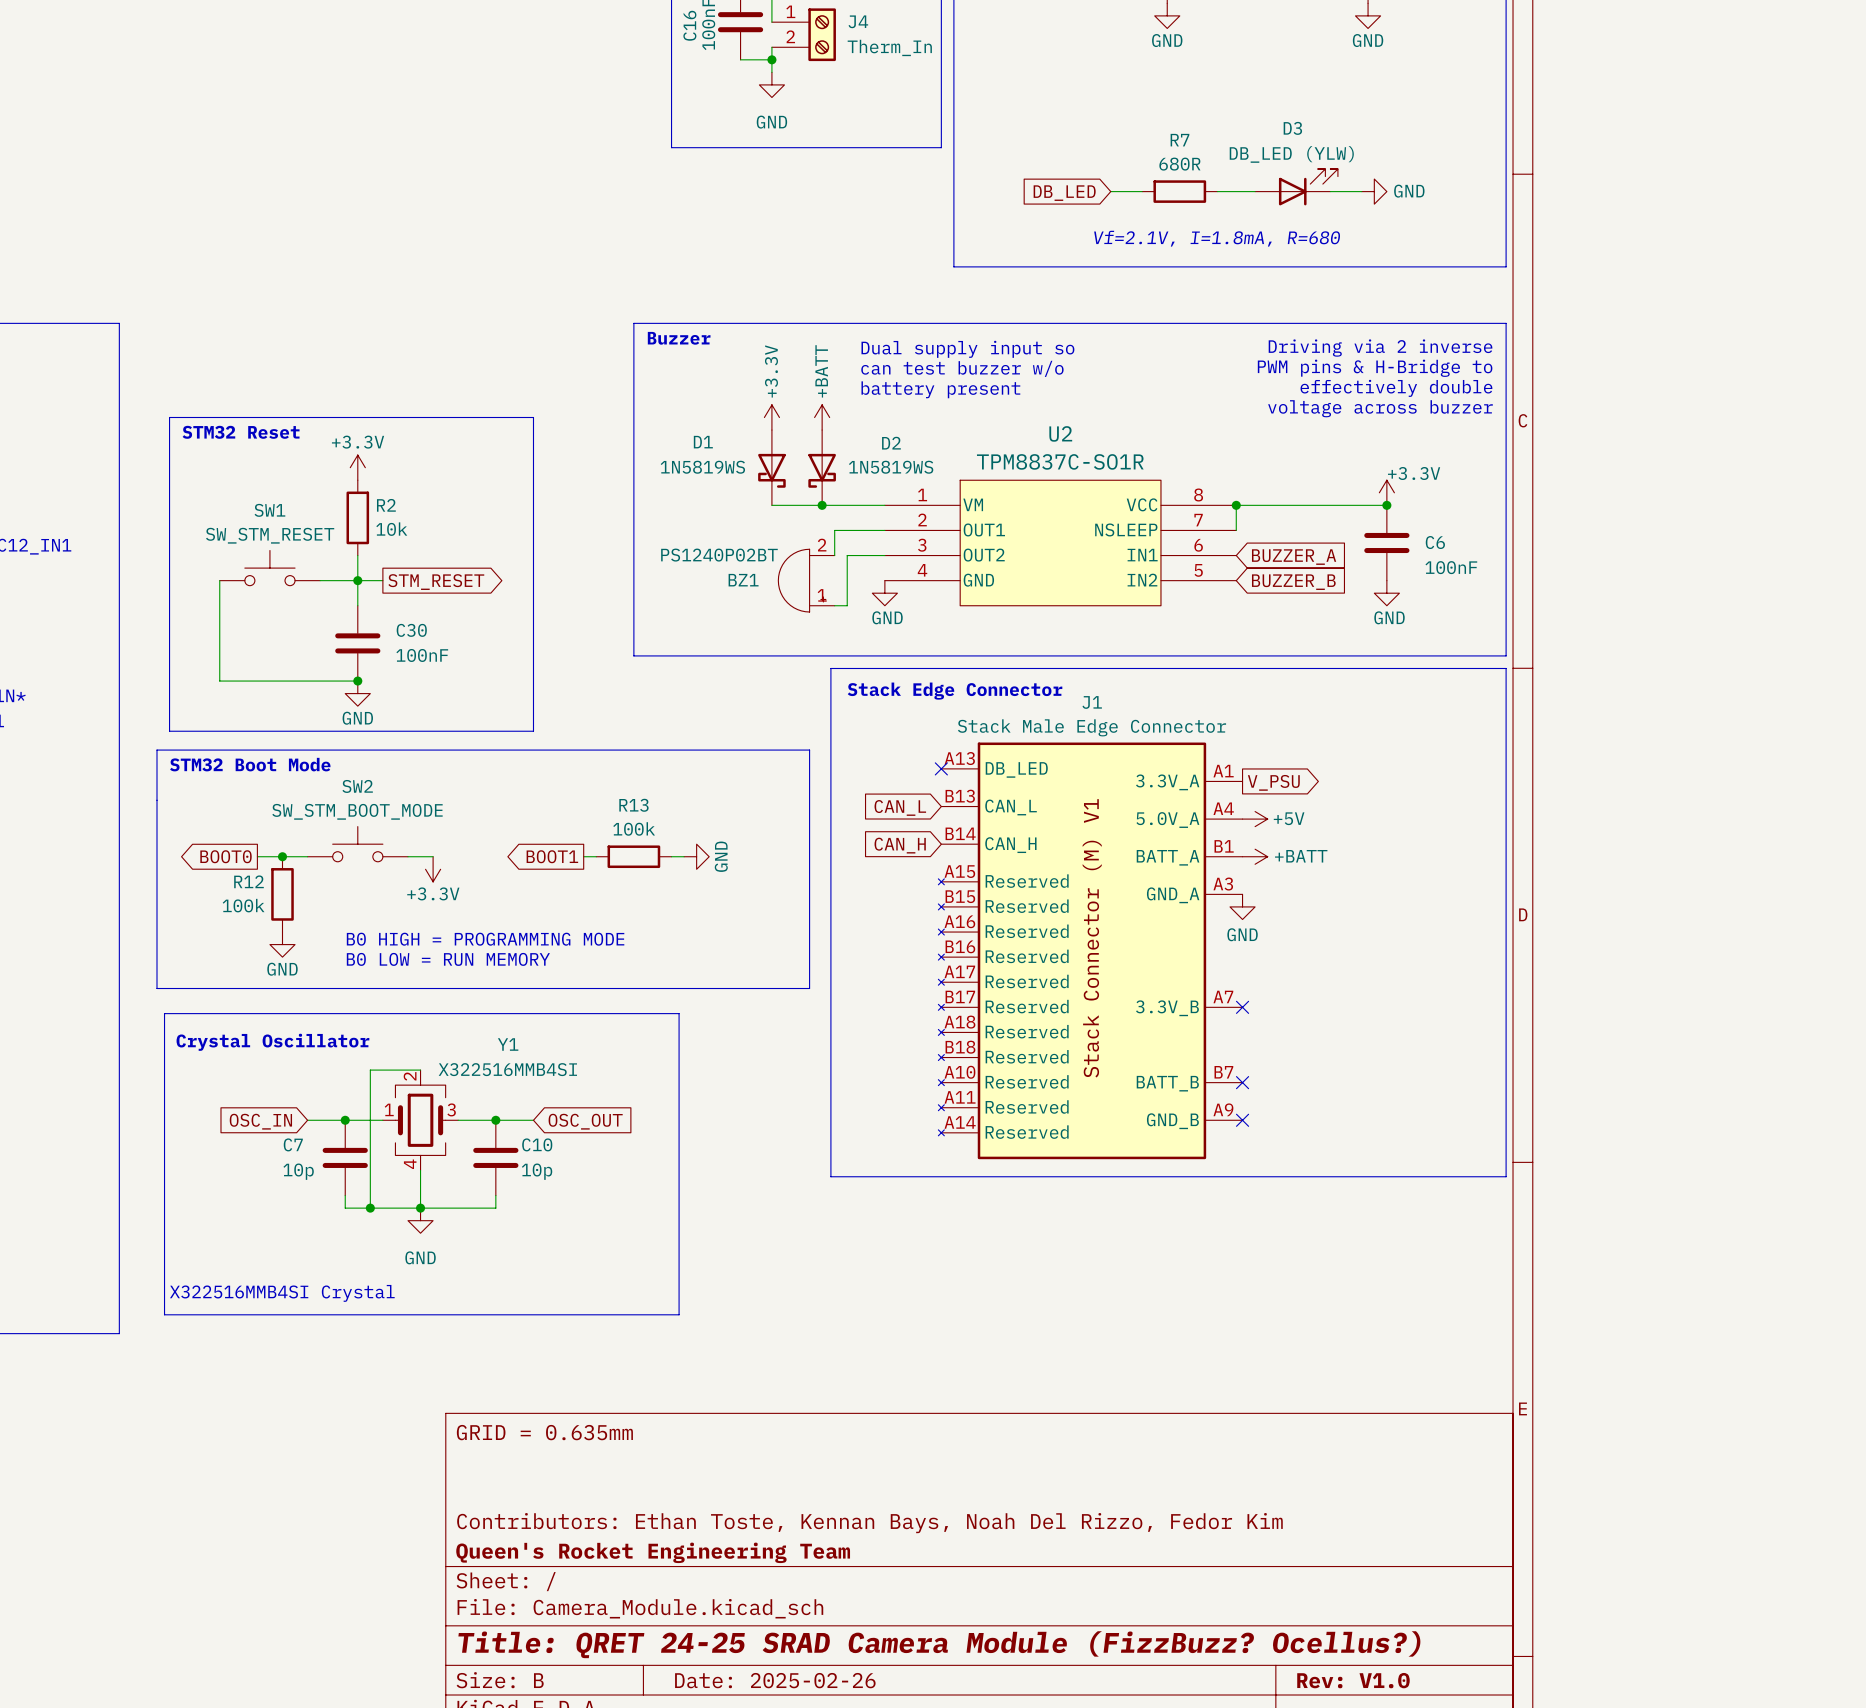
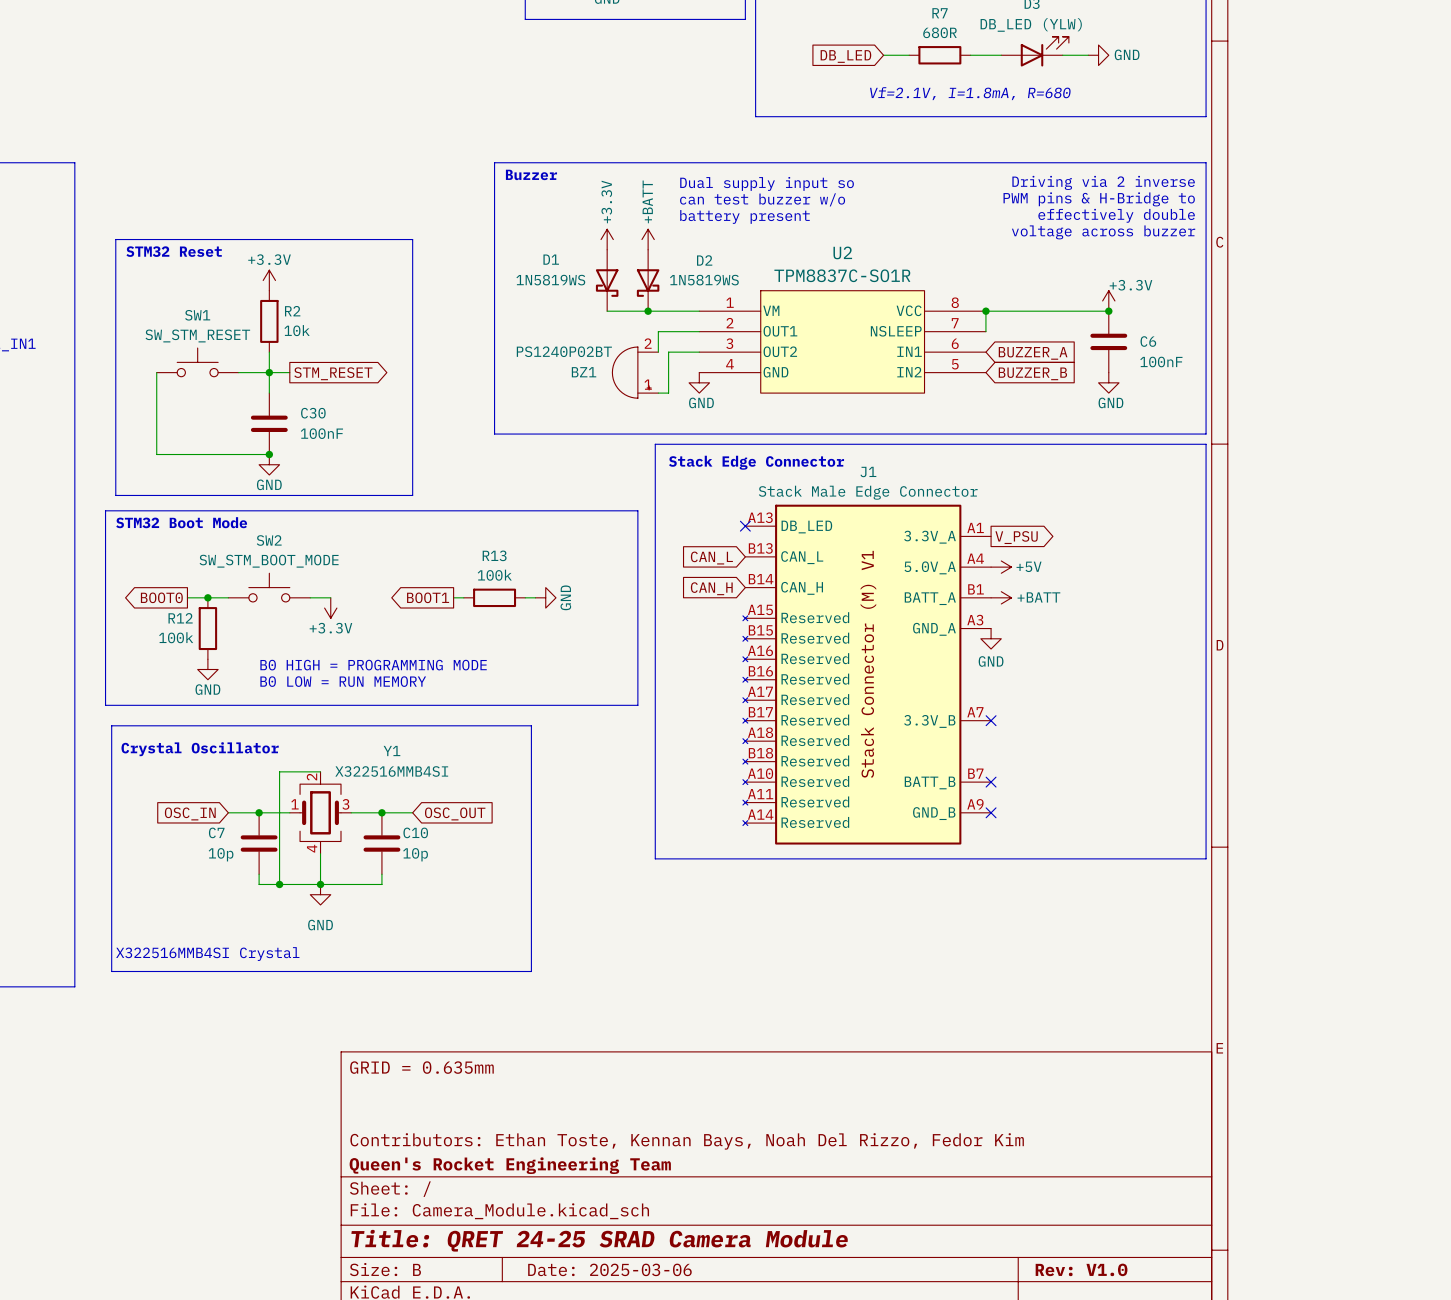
title block: Title: QRET 24-25 SRAD Camera Module (FizzBuzz? Ocellus?) (939, 1644) -> Title: QRET 24-25 SRAD Camera Module (599, 1240)
title block: Date: 2025-02-26 (775, 1680) -> Date: 2025-03-06 (609, 1269)

